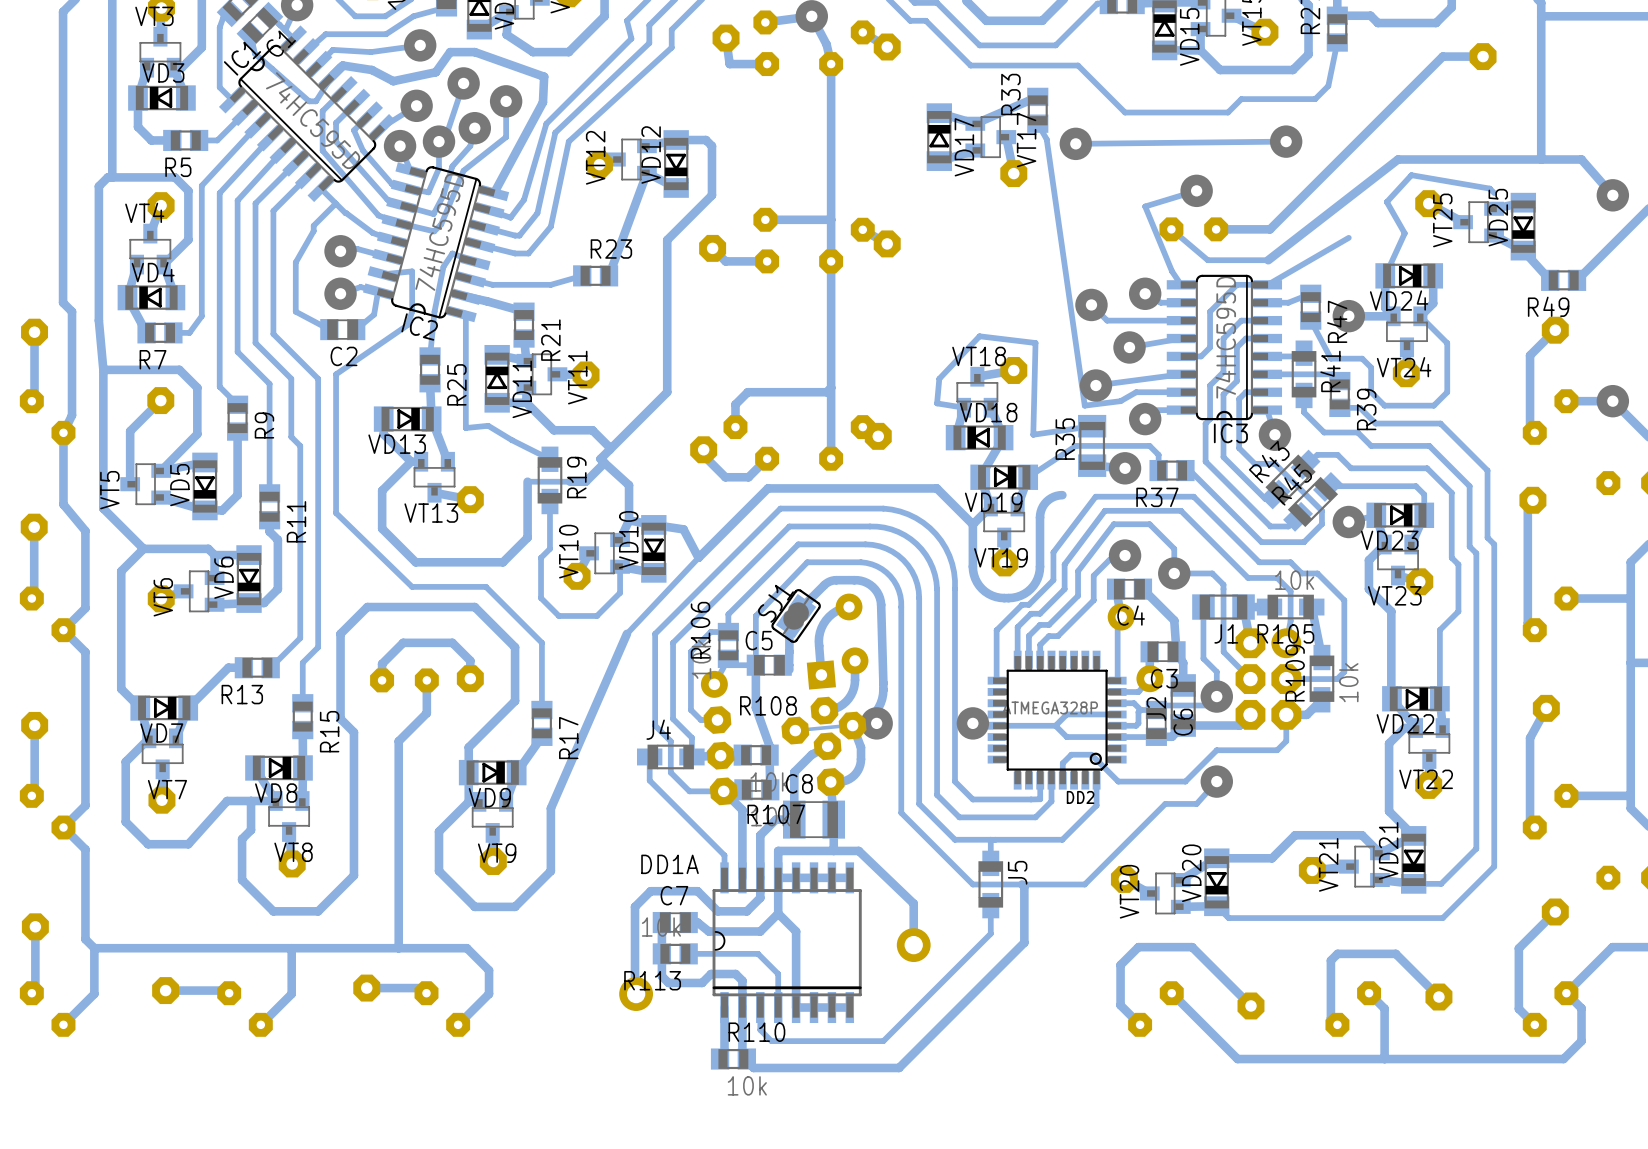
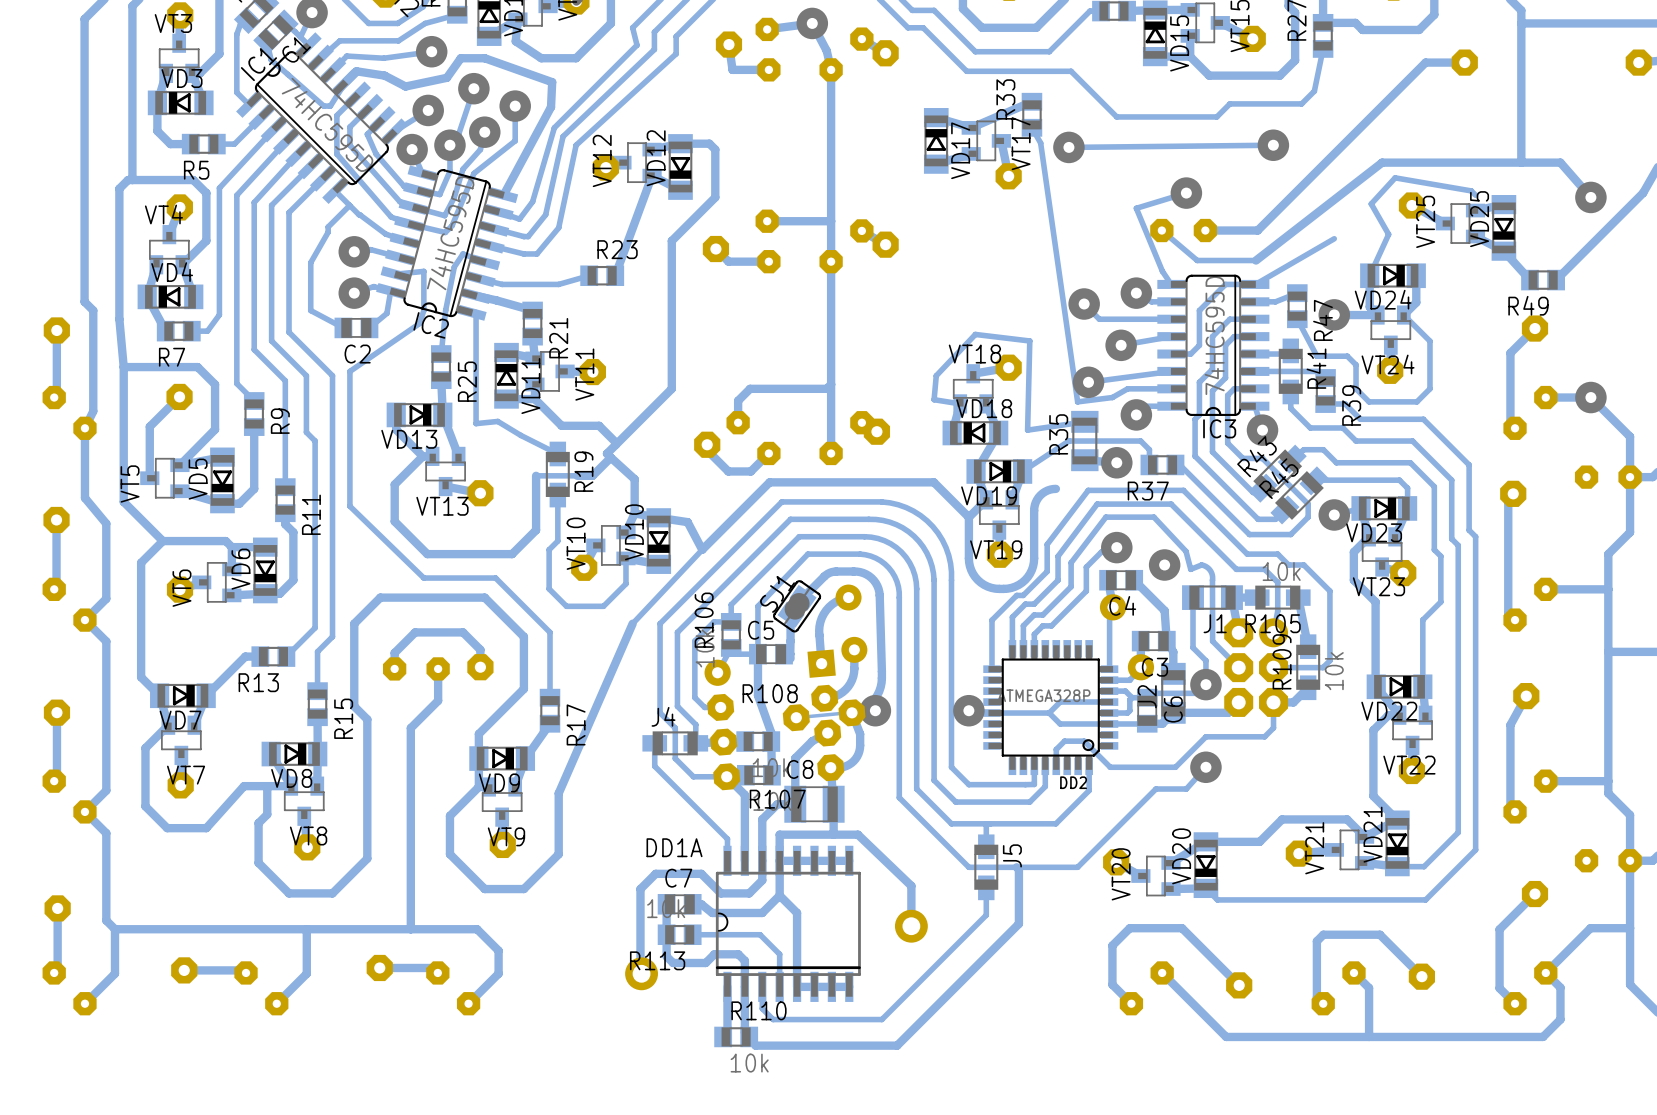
track: (1149, 524) (1174, 548) (1174, 573) (1212, 573) (1223, 584) (1223, 589) -> (1140, 517) (1153, 517) (1186, 551) (1190, 569) (1201, 565) (1204, 566) (1211, 571) (1212, 580)

